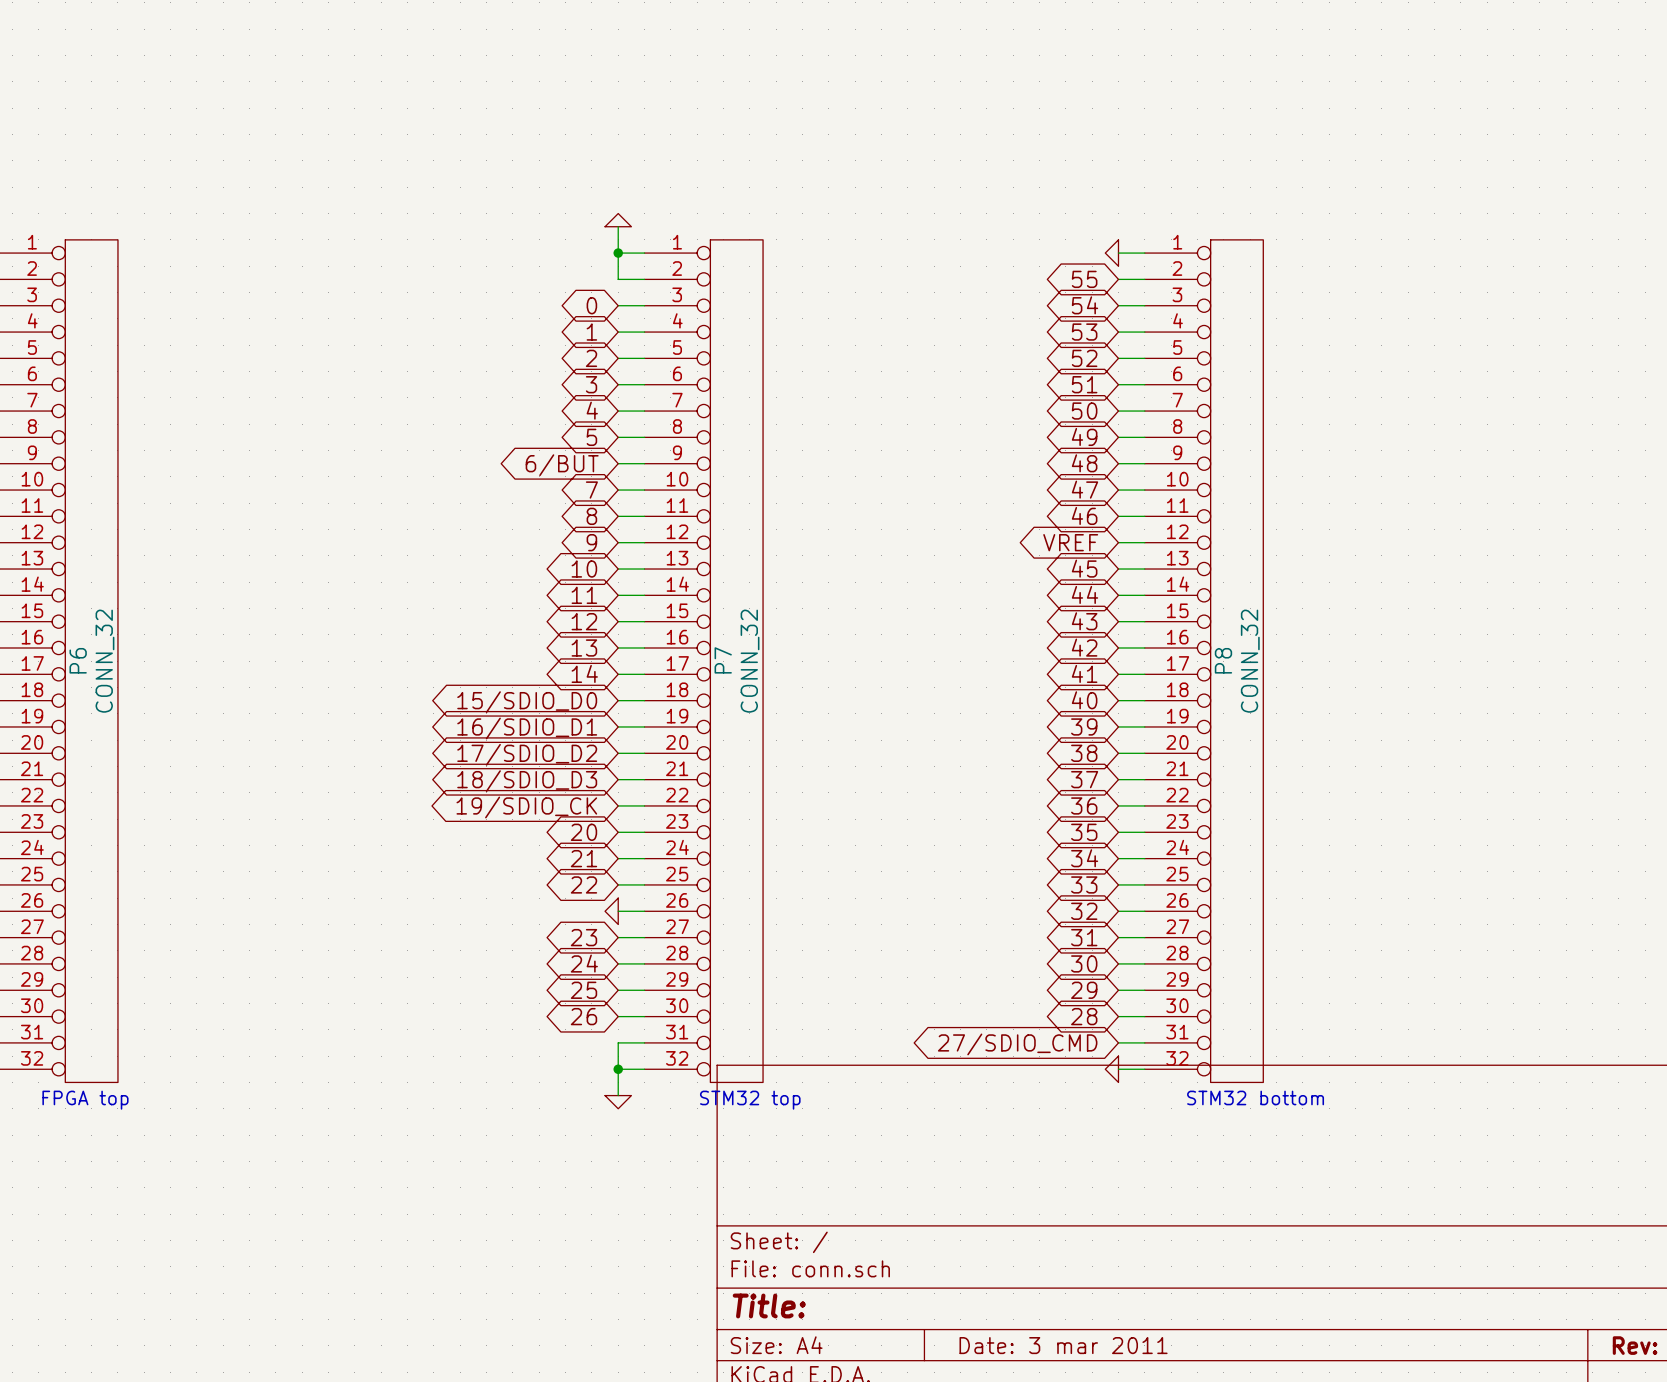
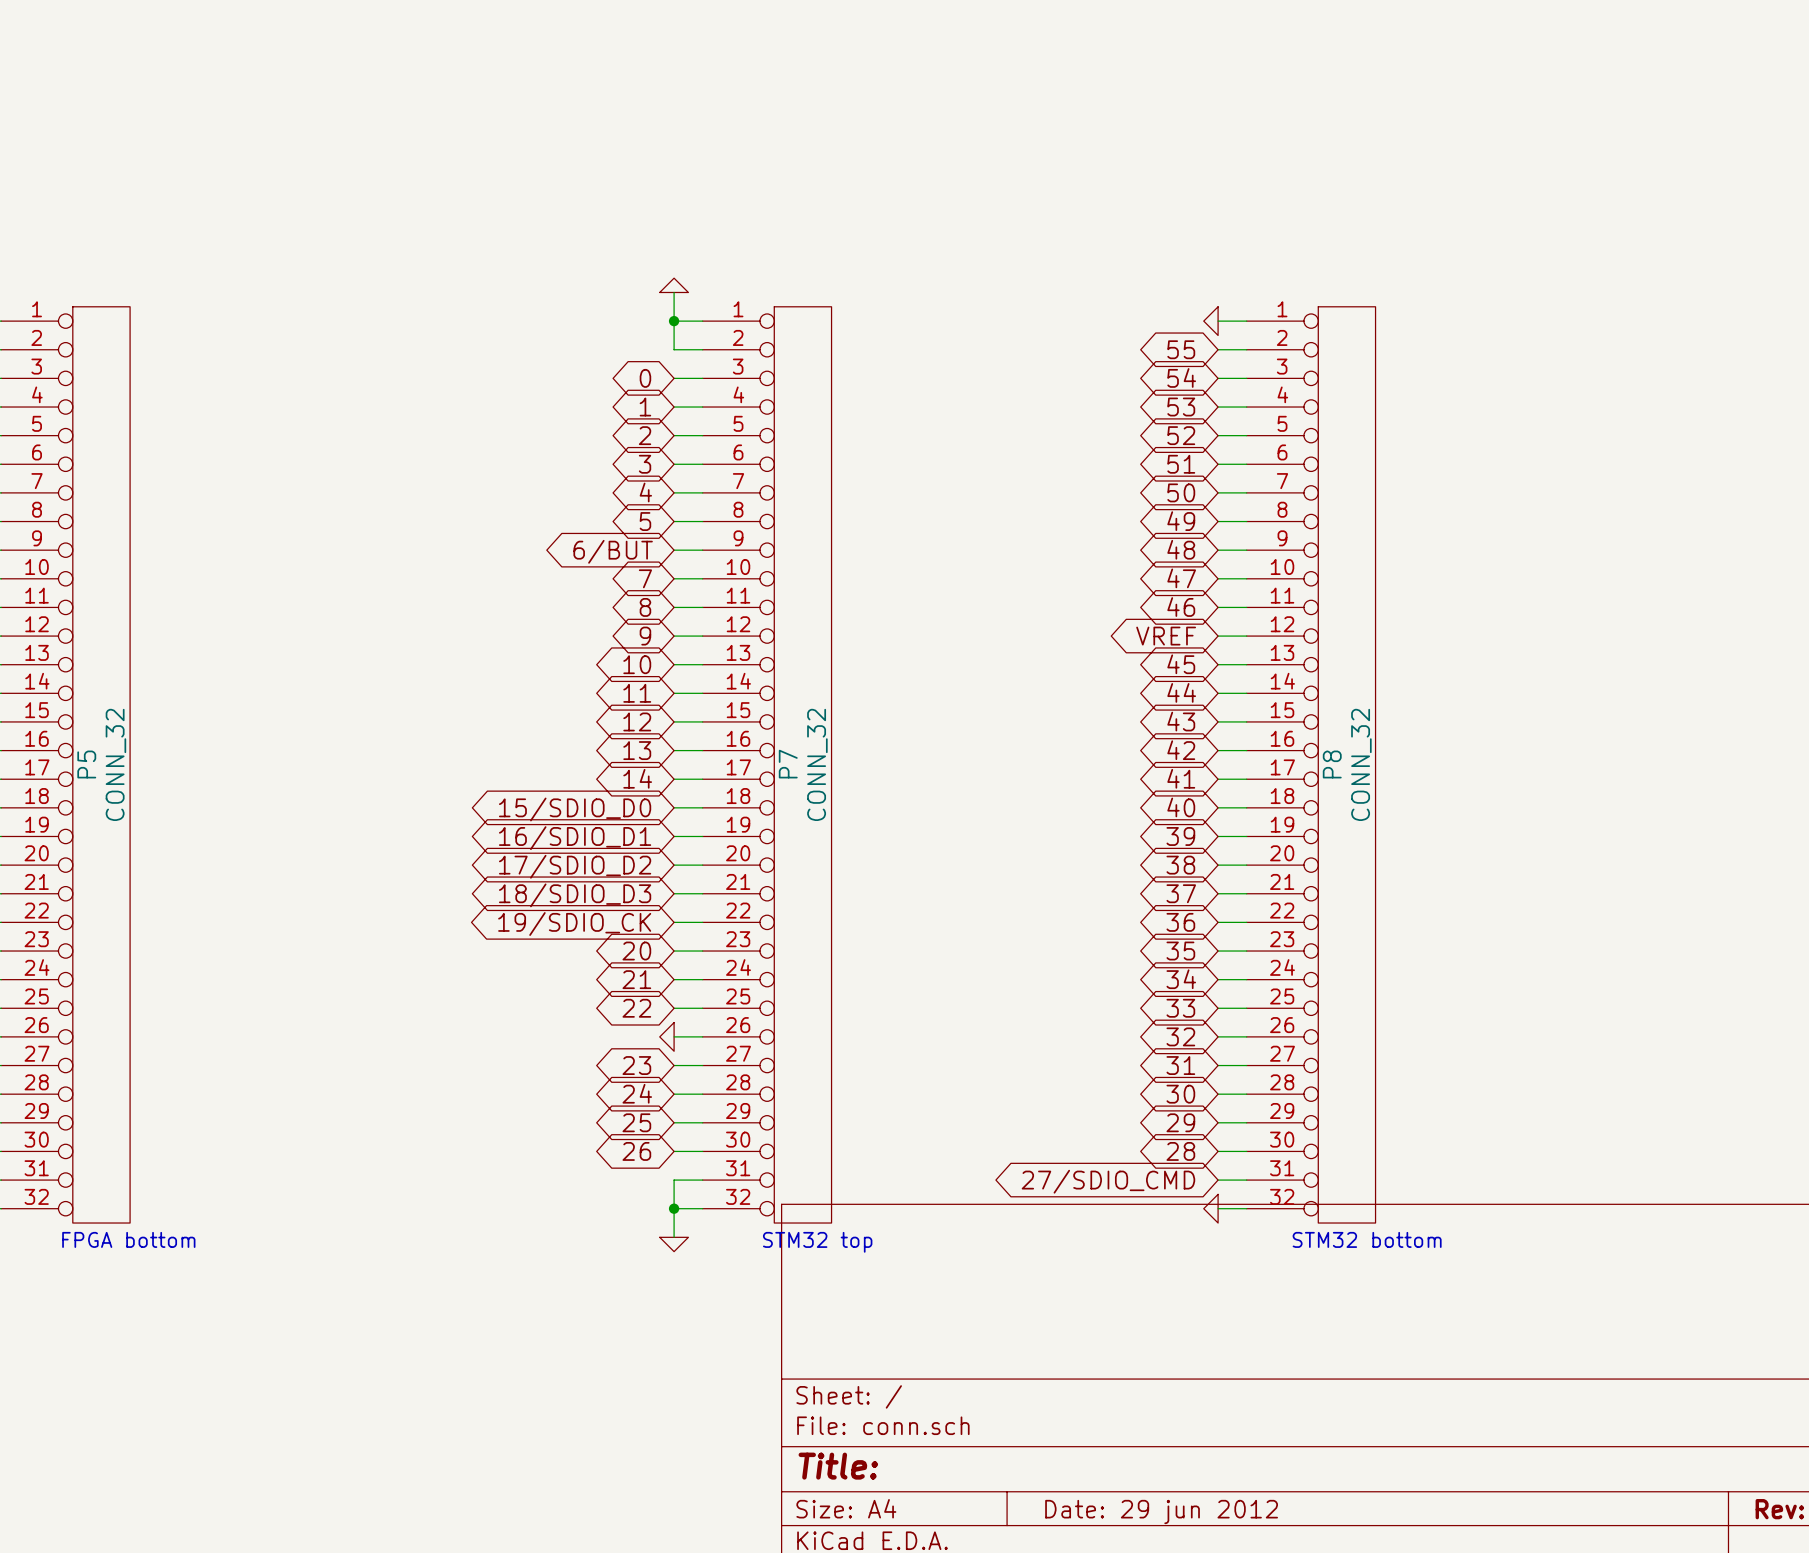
P6 name: P6 (78, 660) -> P5 (86, 764)
text: FPGA top (85, 1100) -> FPGA bottom (128, 1239)
title block: Date: 3 mar 2011 (1063, 1345) -> Date: 29 jun 2012 (1161, 1511)

